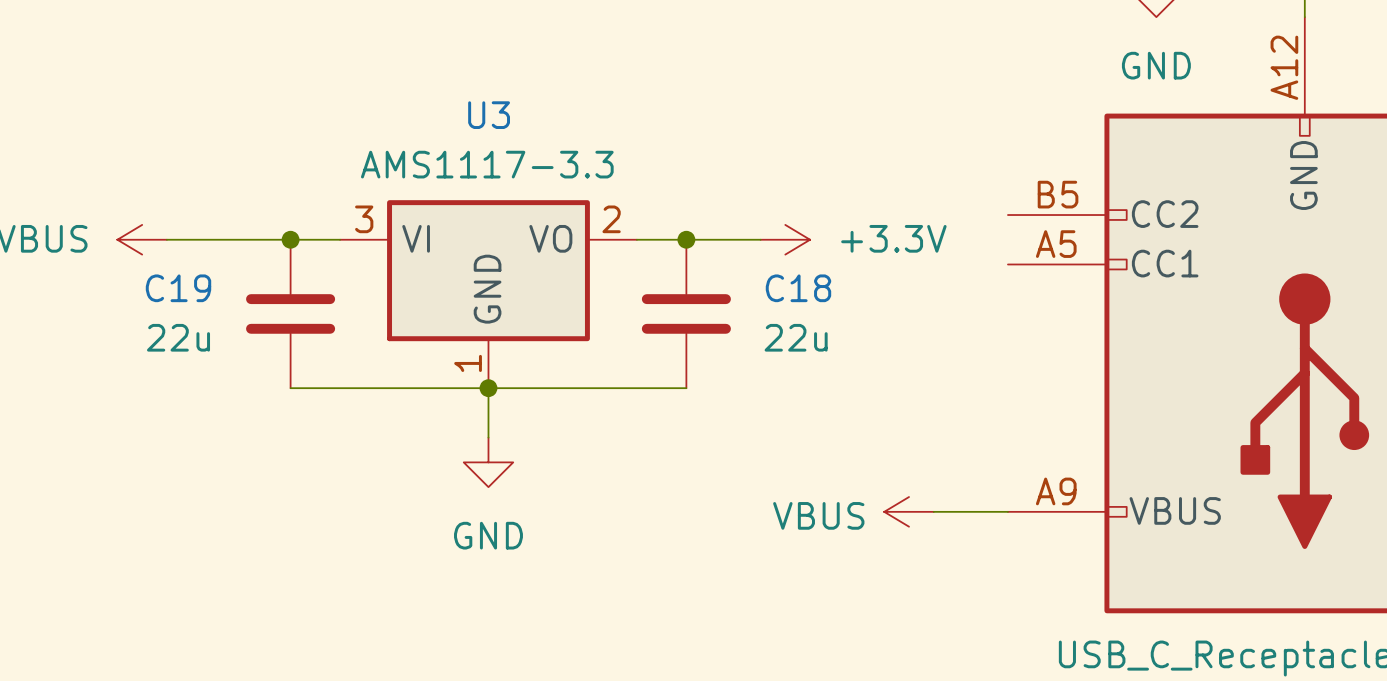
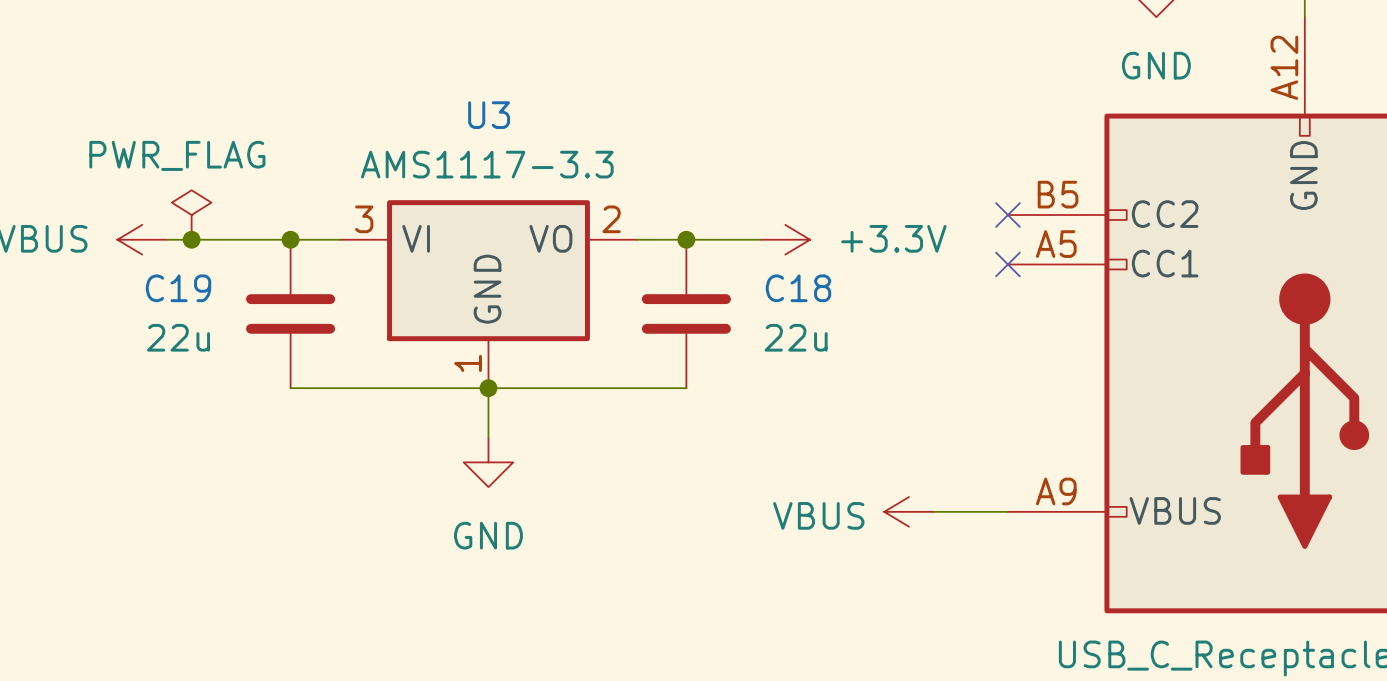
power symbol: none -> PWR_FLAG (191, 215)
no-connect mark: none -> (1007, 215)
junction: none -> (191, 239)
no-connect mark: none -> (1007, 264)

